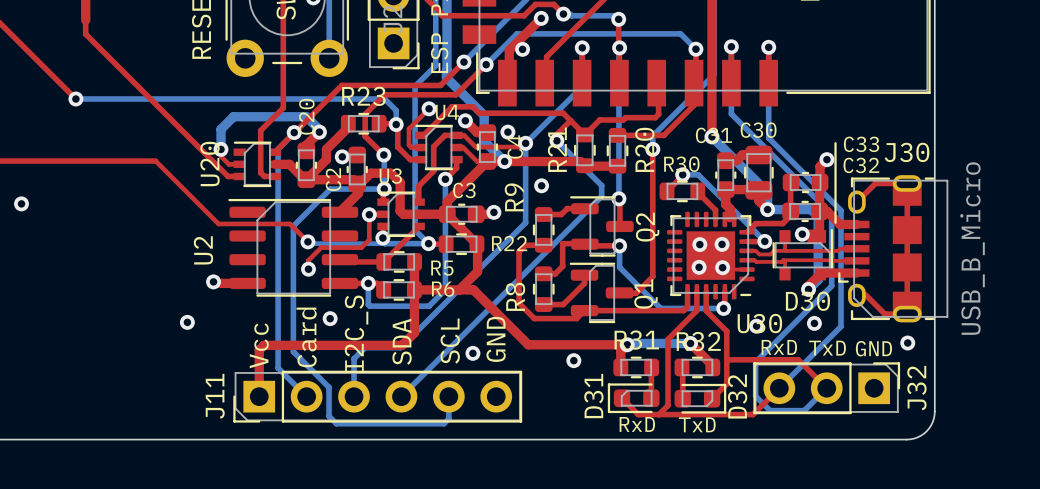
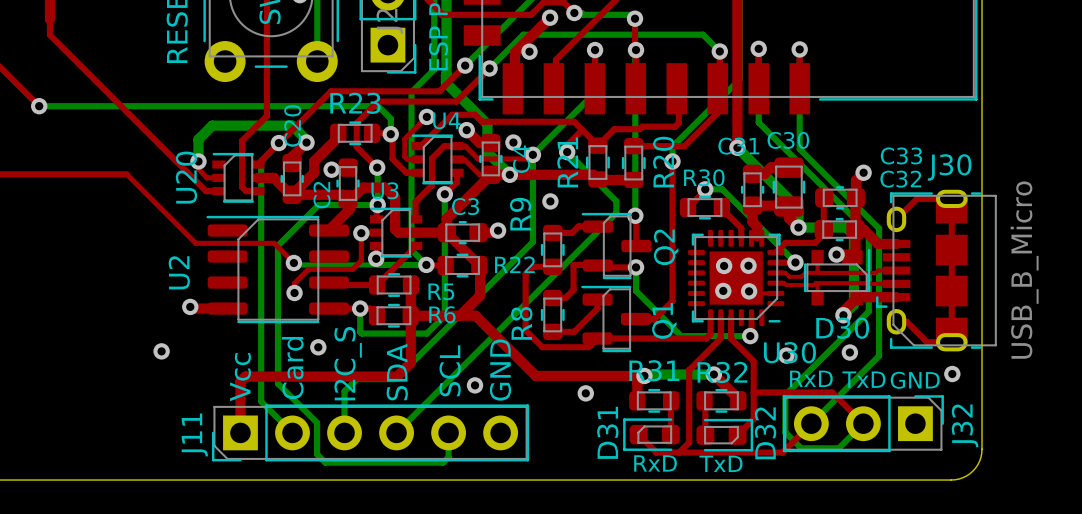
line: (835, 143) (835, 222) -> none

